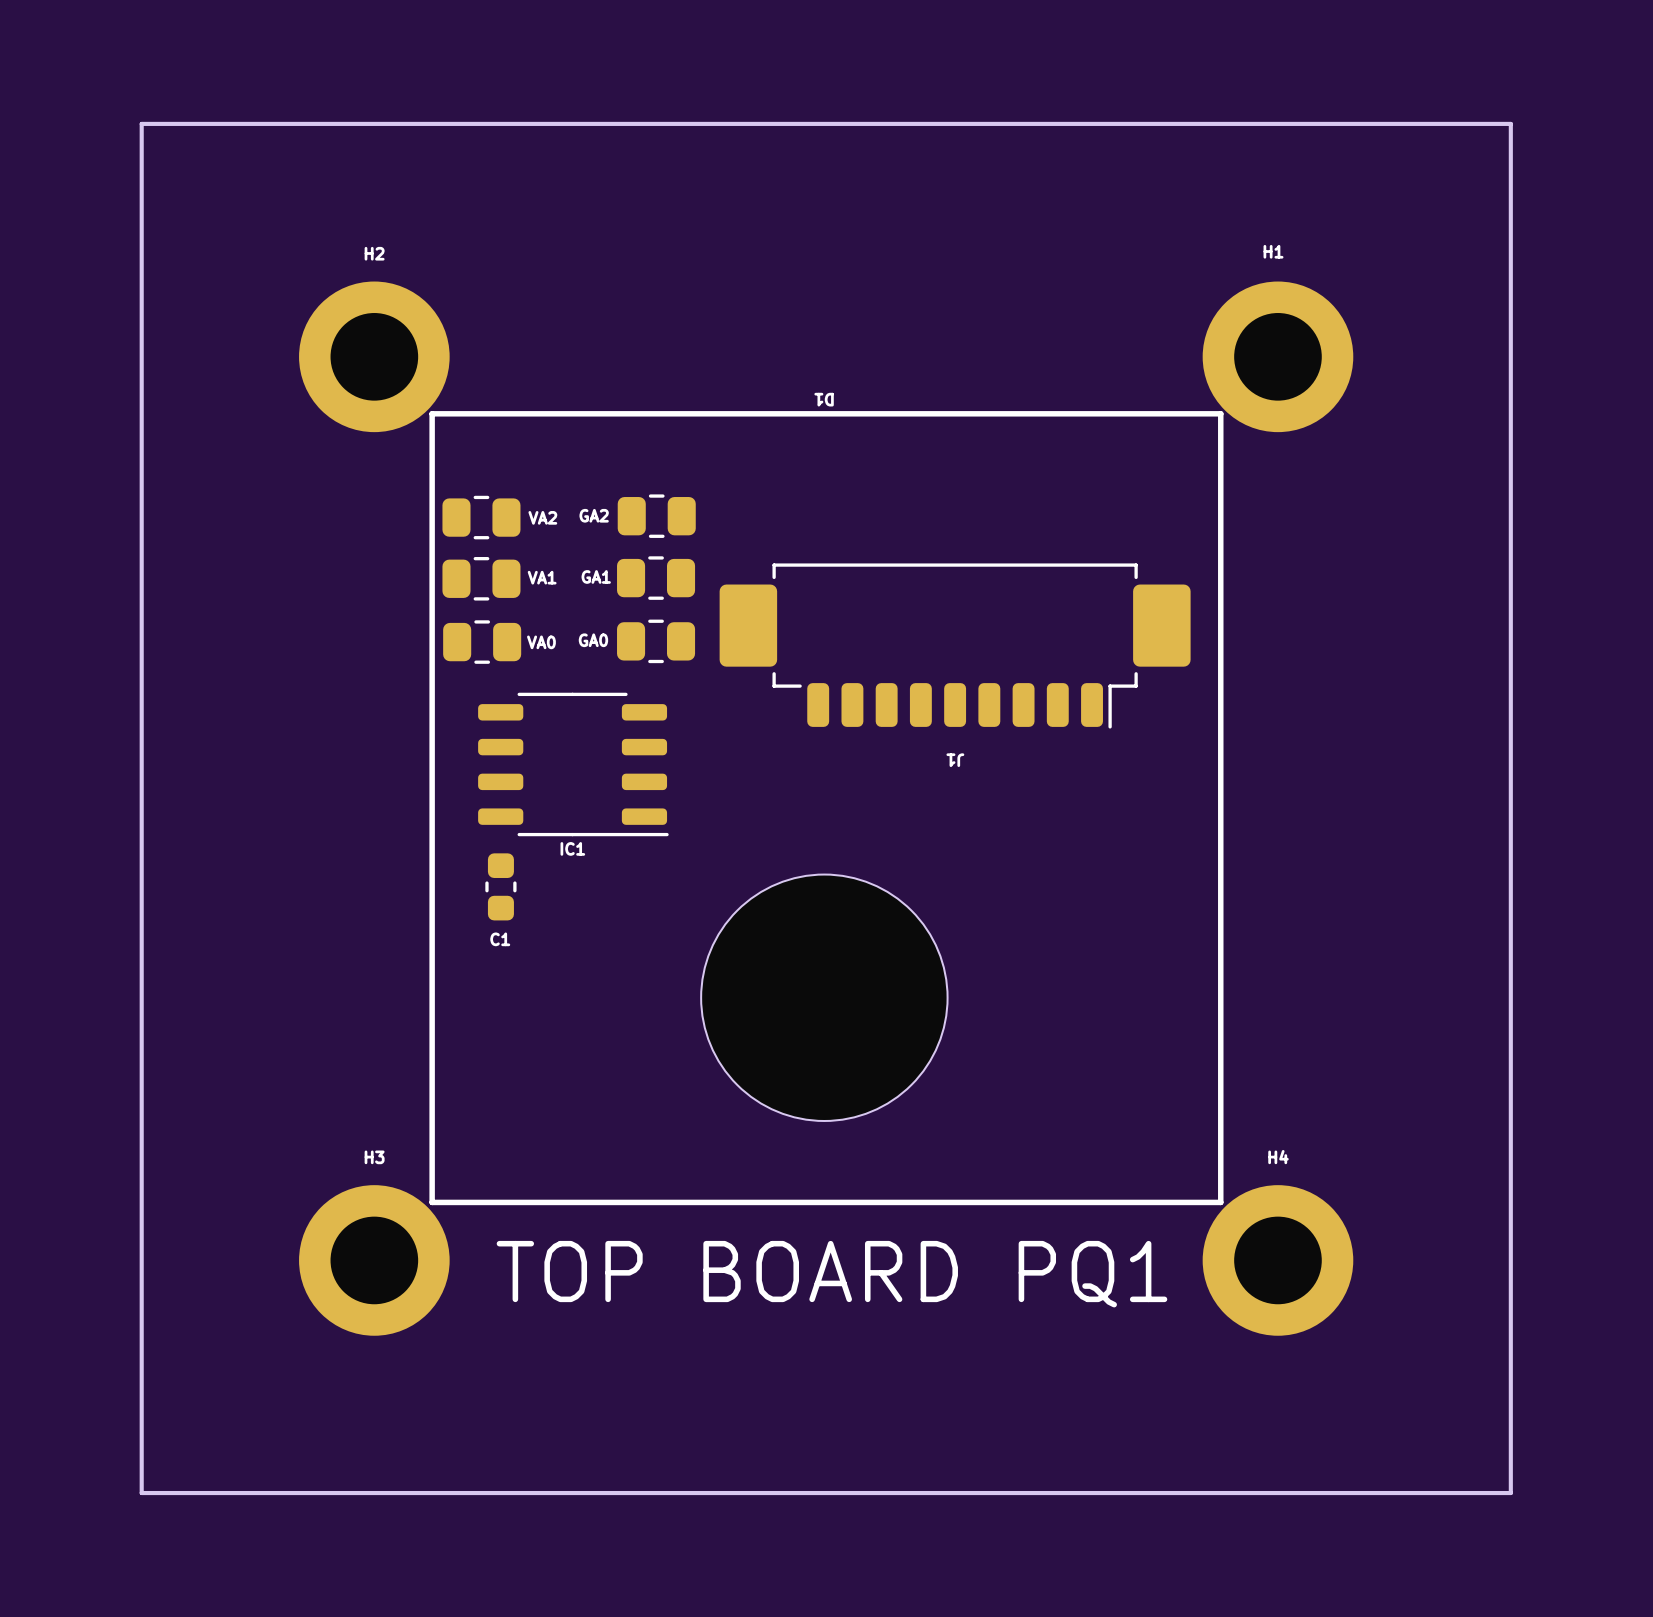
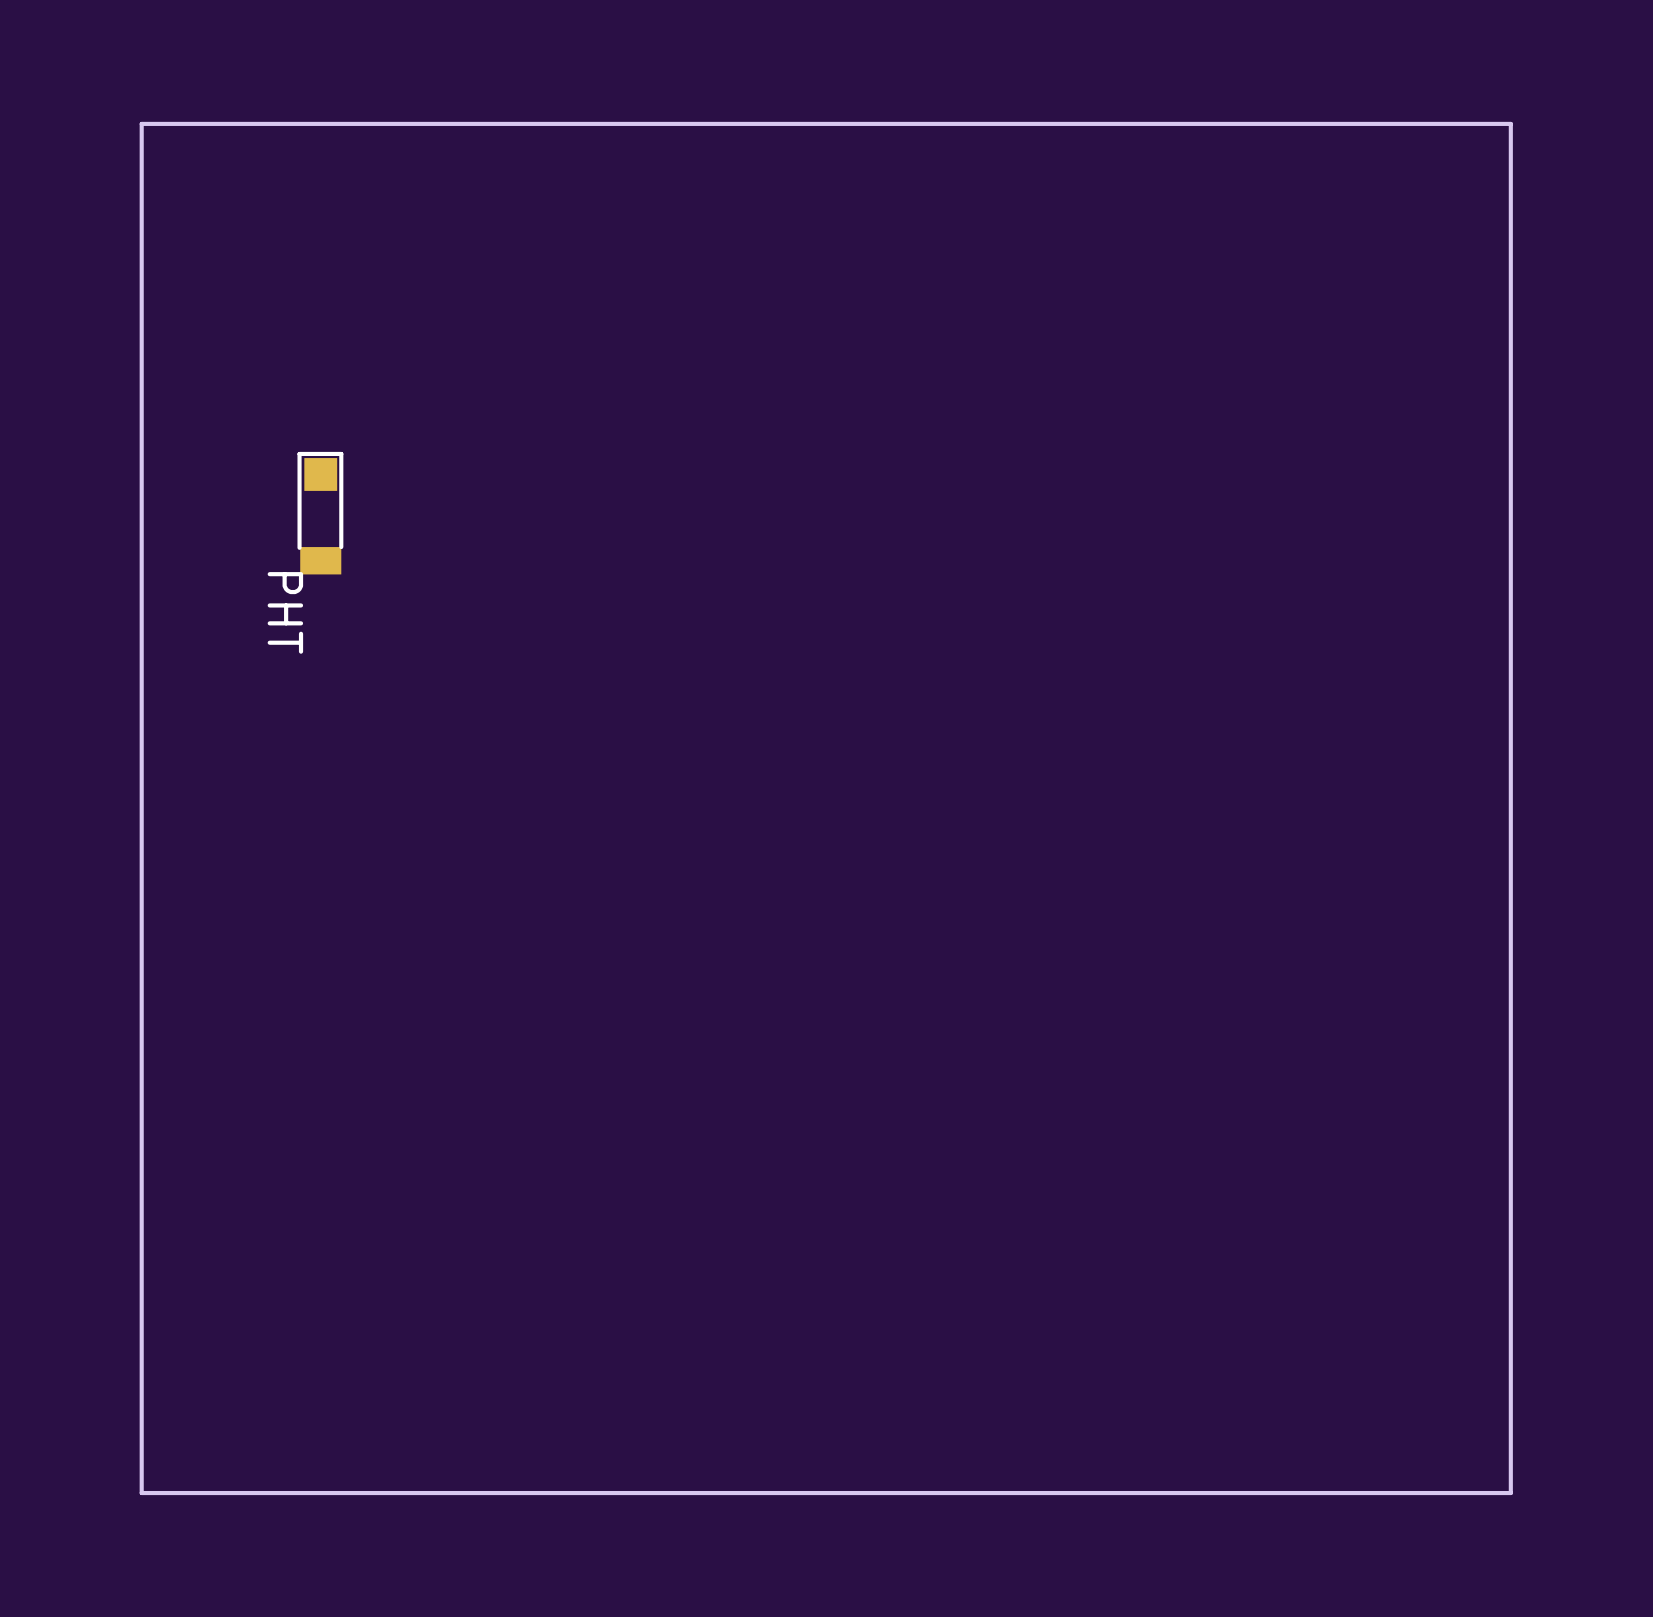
H2: (374, 356) -> none
H1: (1277, 356) -> none
D1: (824, 399) -> none
line: (1220, 413) (432, 413) (432, 1202) (1220, 1202) (1220, 413) -> none
PHT: none -> (320, 513)
GA2: (656, 516) -> none
VA2: (481, 517) -> none
VA1: (481, 578) -> none
GA1: (656, 578) -> none
GA0: (656, 641) -> none
VA0: (482, 642) -> none
J1: (955, 645) -> none
IC1: (573, 764) -> none
C1: (500, 886) -> none
part: (824, 997) -> none
H3: (374, 1260) -> none
H4: (1277, 1260) -> none
text: TOP BOARD PQ1 (831, 1274) -> none

